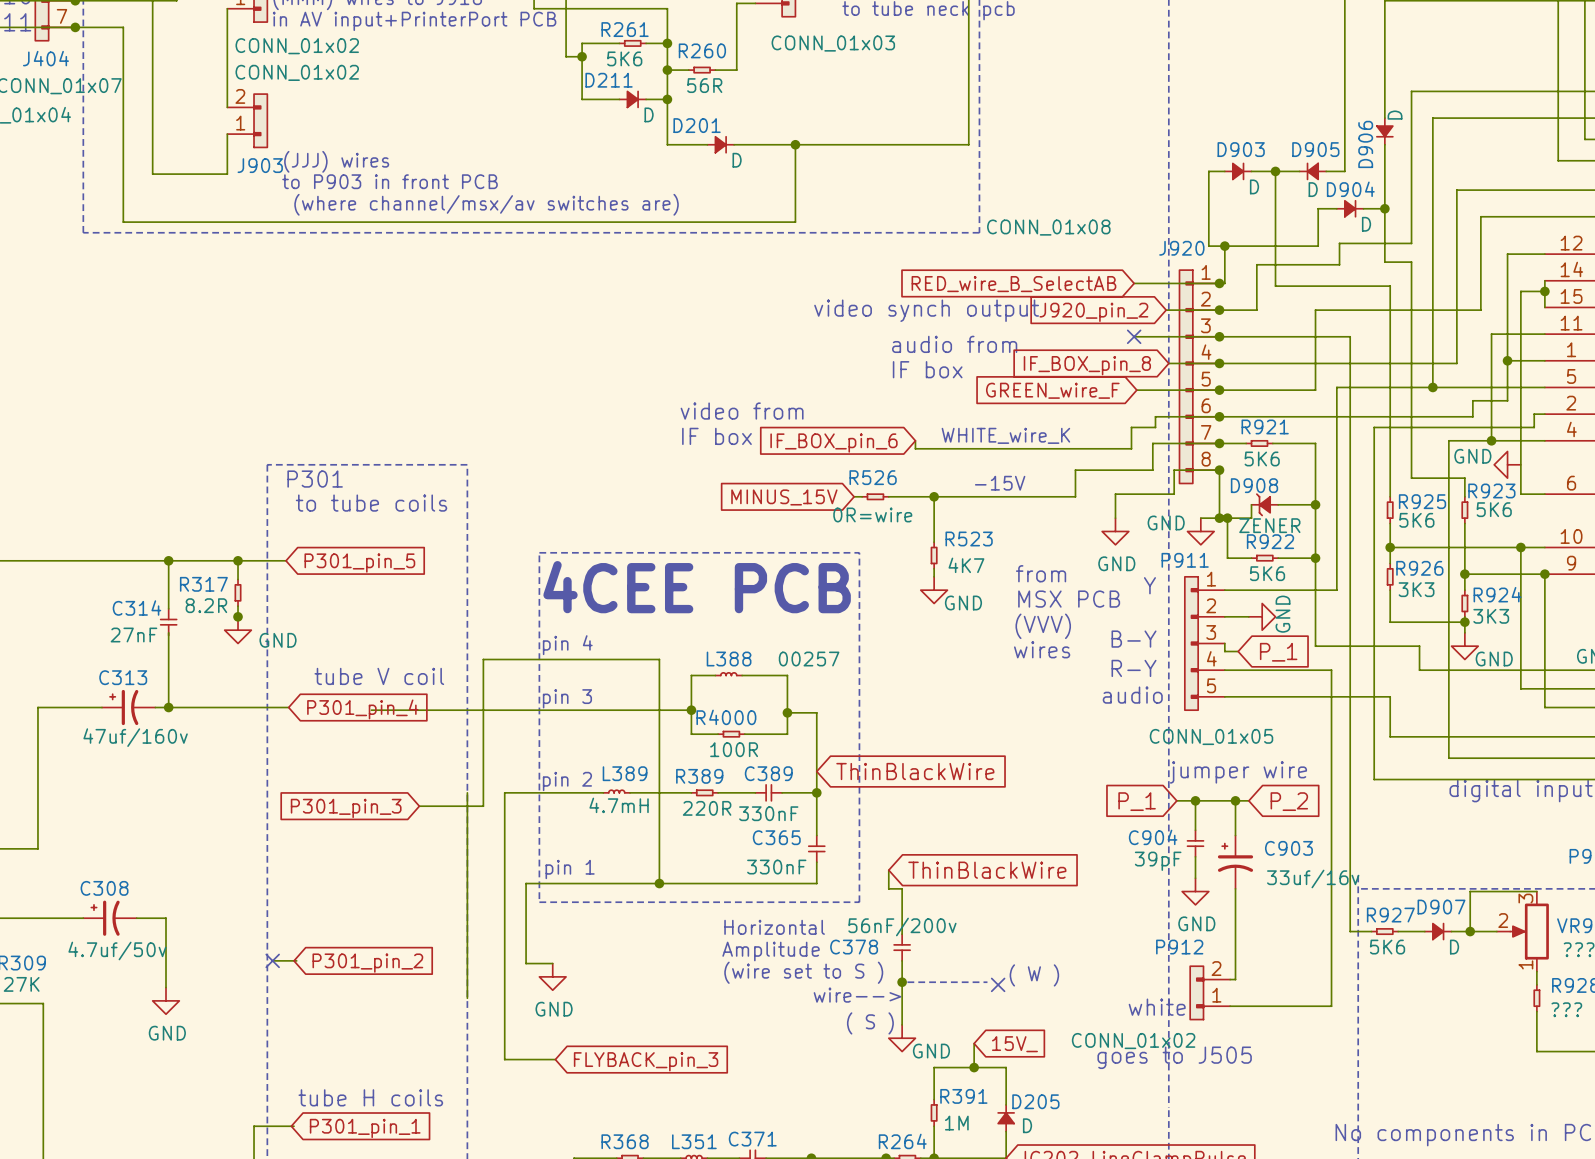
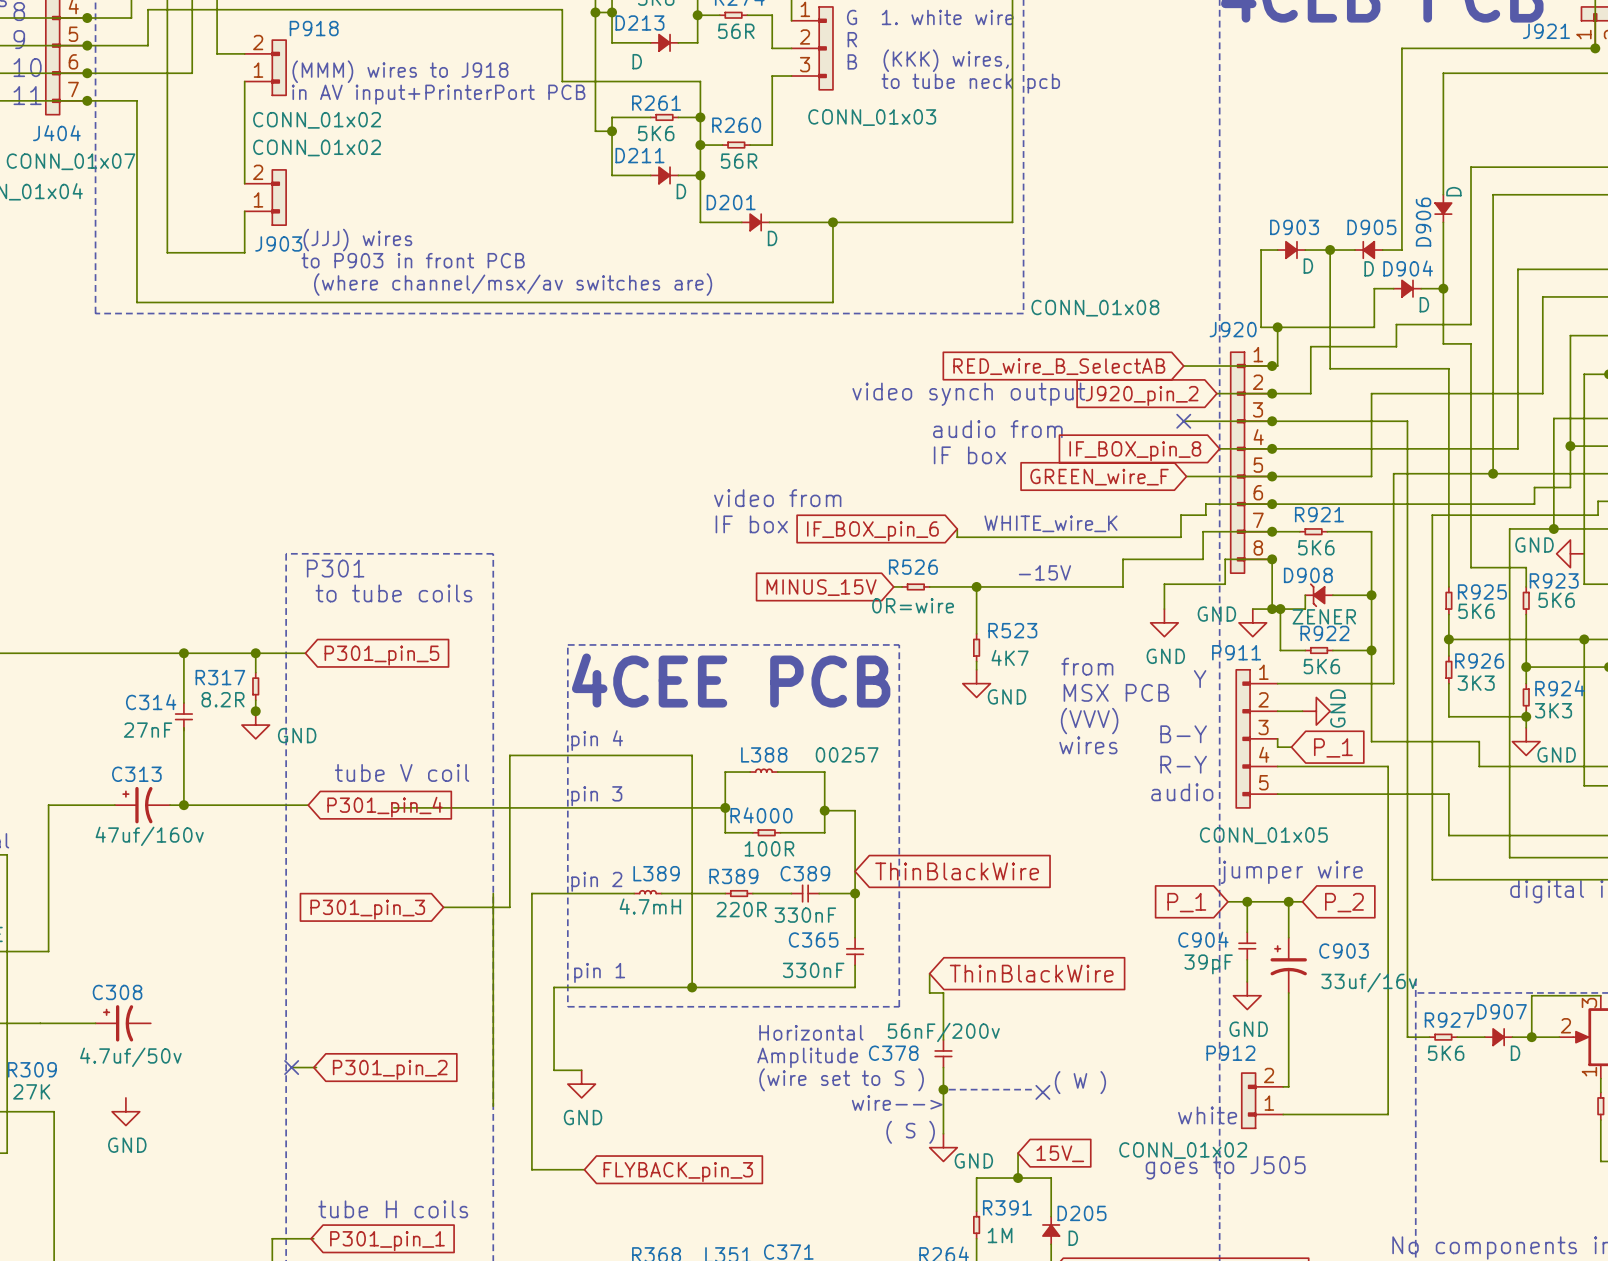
wire: (136, 918) (166, 918) (166, 987) -> none
power symbol position: GND (166, 1000) -> GND (125, 1111)

